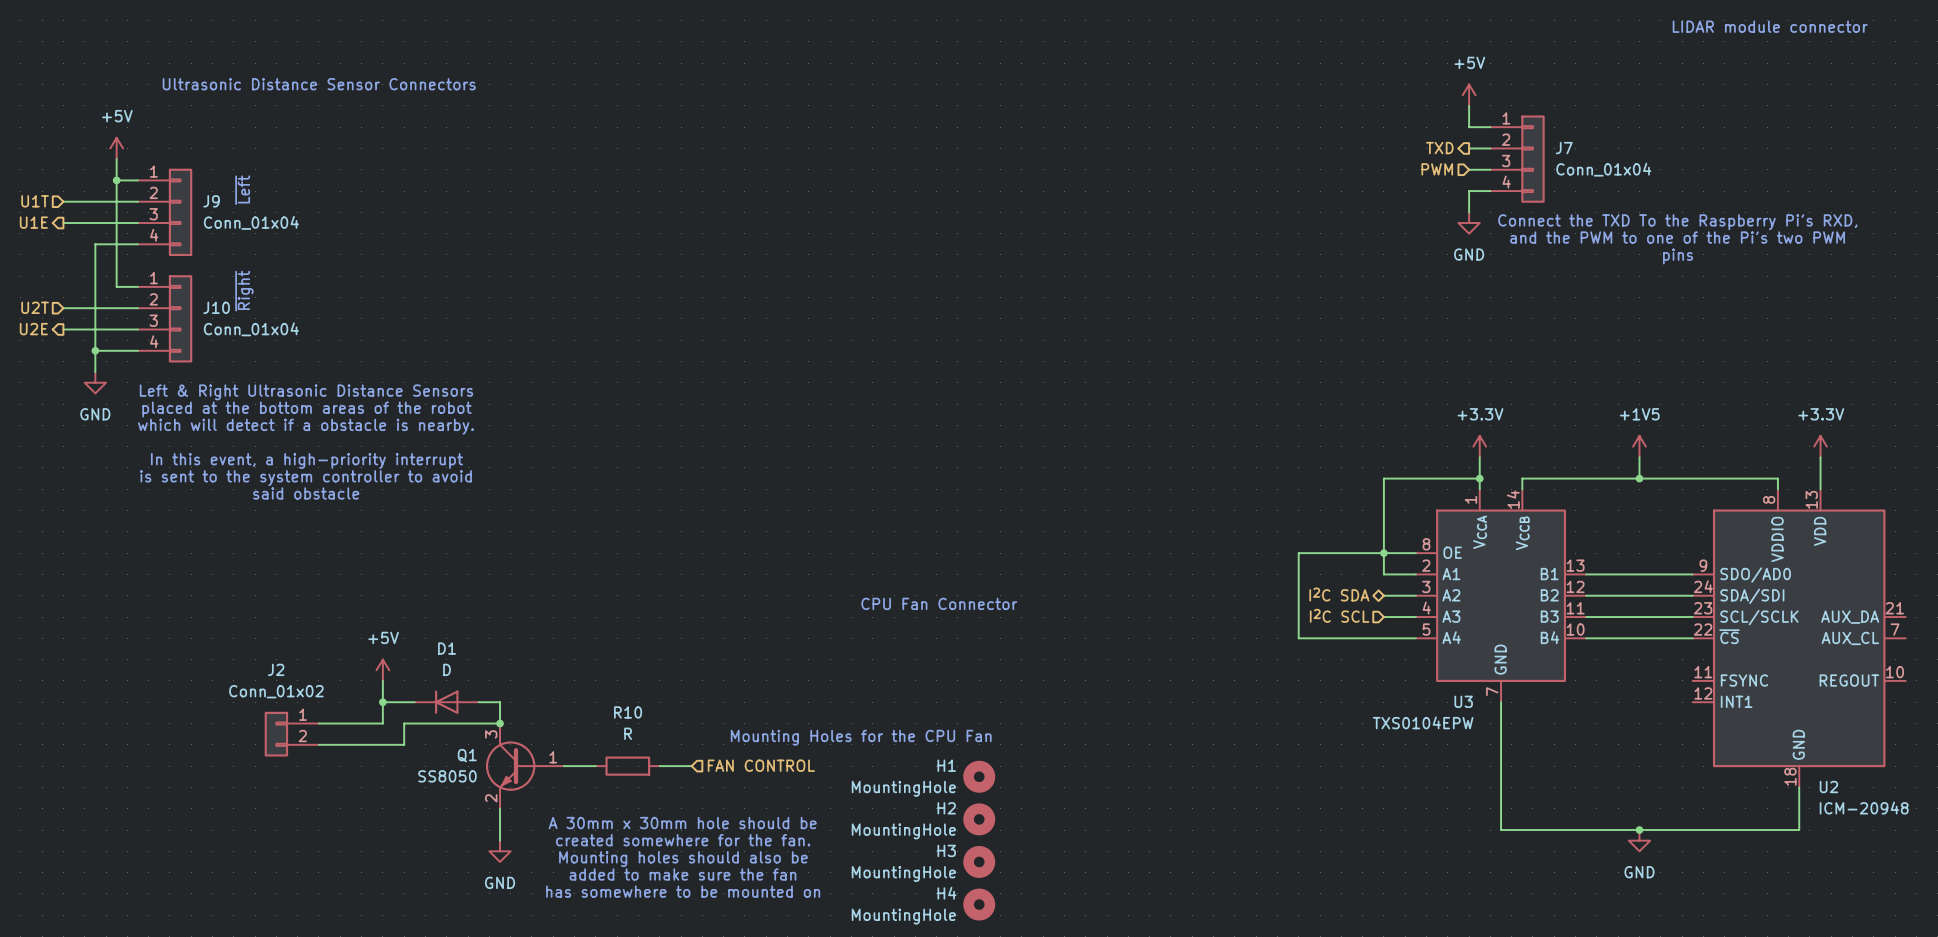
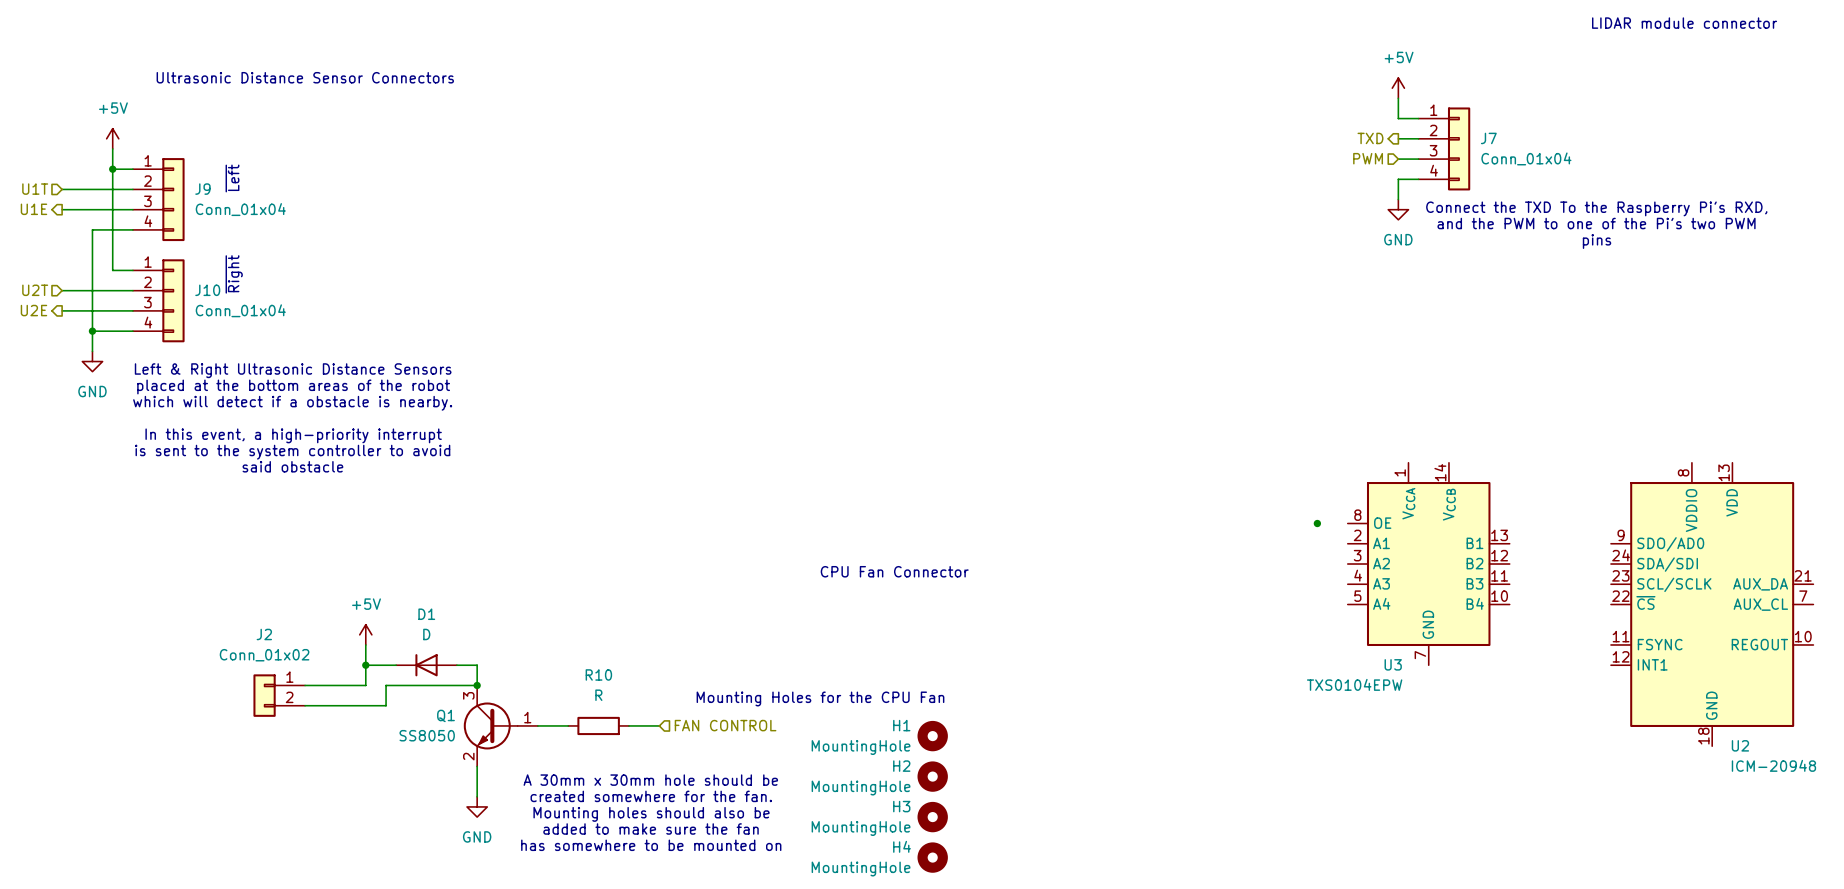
power symbol: +3.3V (1479, 446) -> none
power symbol: +1V5 (1639, 446) -> none
power symbol: +3.3V (1820, 446) -> none
wire: (1479, 457) (1479, 489) -> none
wire: (1639, 457) (1639, 478) -> none
wire: (1820, 457) (1820, 489) -> none
wire: (1479, 478) (1383, 478) (1383, 574) (1415, 574) -> none
junction: (1479, 478) -> none
junction: (1639, 478) -> none
wire: (1522, 489) (1522, 478) (1777, 478) (1777, 489) -> none
wire: (1415, 553) (1298, 553) (1298, 638) (1415, 638) -> none
wire: (1586, 574) (1692, 574) -> none
hierarchical label: I2C SDA (1339, 594) -> none
wire: (1383, 595) (1415, 595) -> none
wire: (1586, 595) (1692, 595) -> none
hierarchical label: I2C SCL (1339, 615) -> none
wire: (1383, 617) (1415, 617) -> none
wire: (1586, 617) (1692, 617) -> none
wire: (1586, 638) (1692, 638) -> none
wire: (1501, 702) (1501, 830) (1799, 830) (1799, 787) -> none
junction: (1639, 830) -> none
power symbol: GND (1639, 840) -> none

